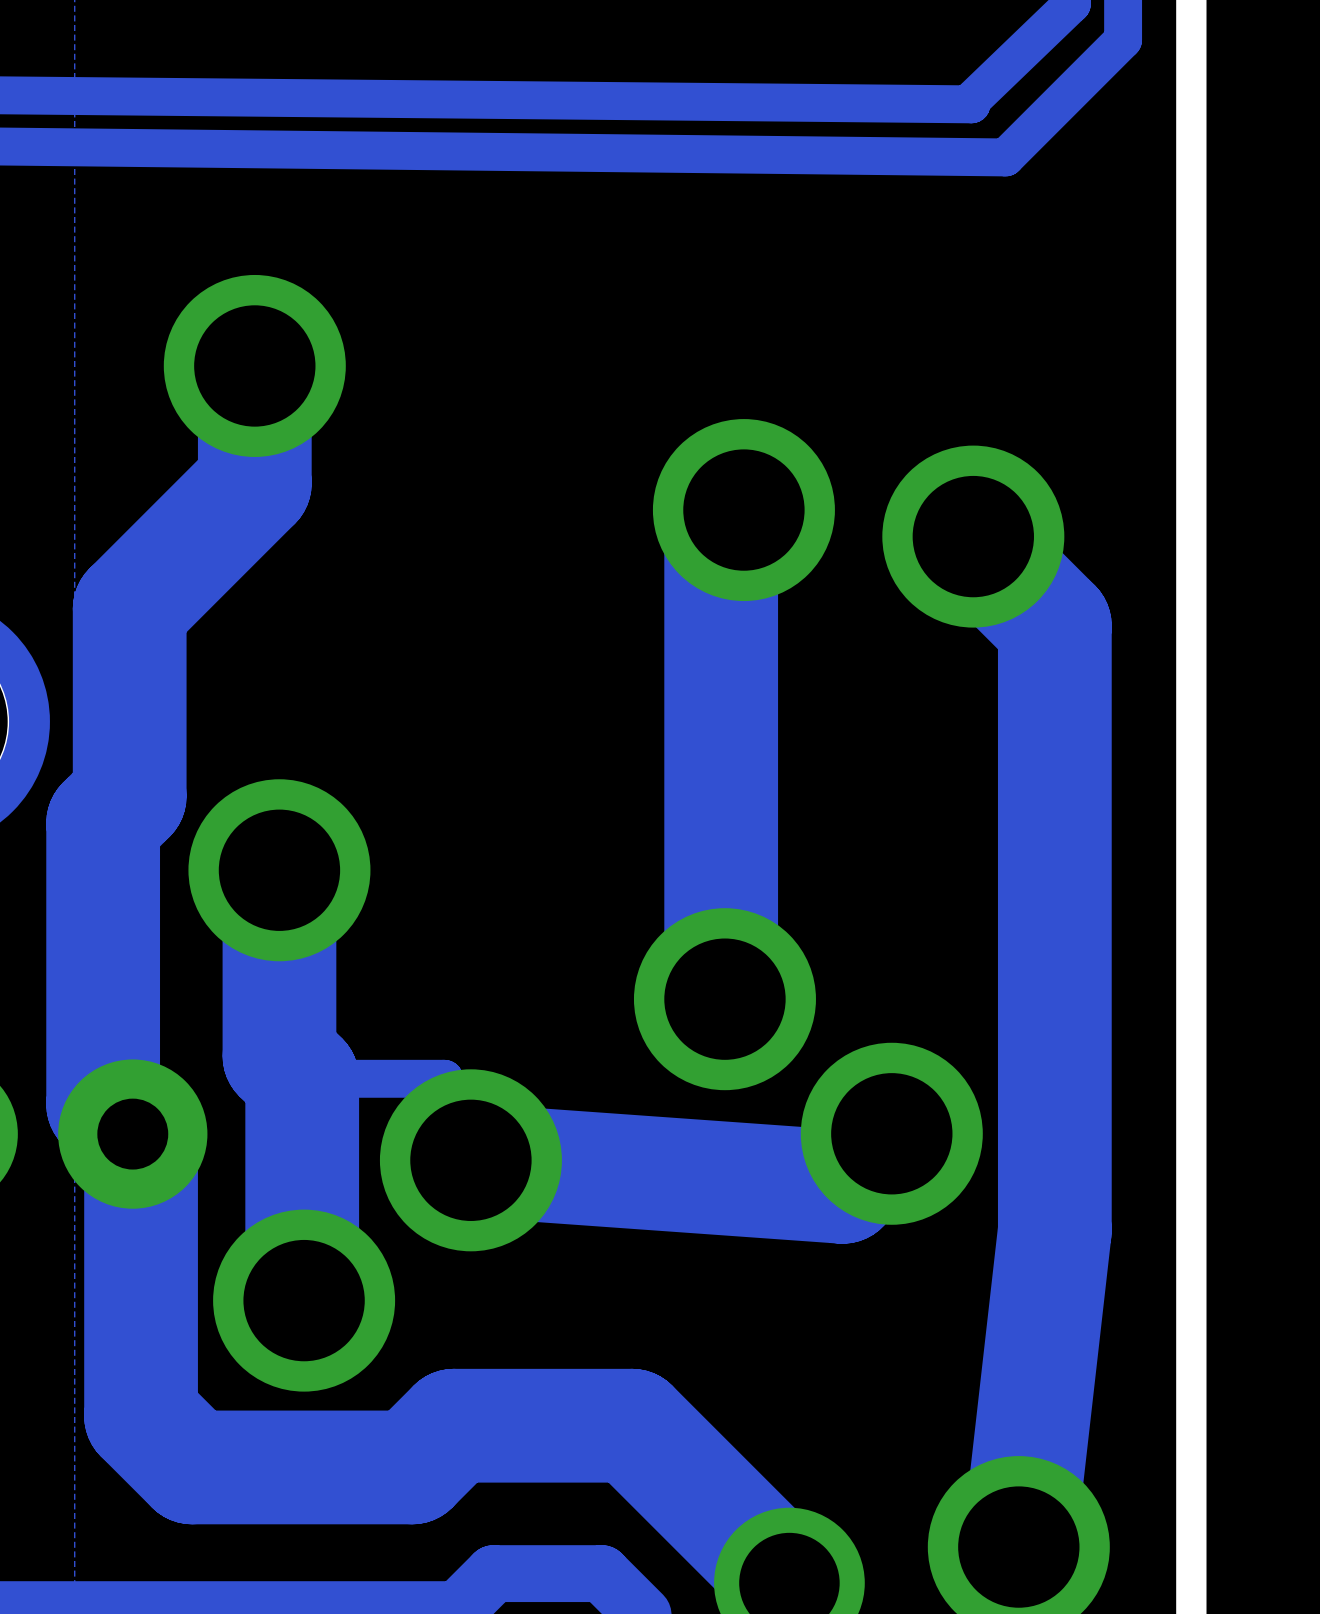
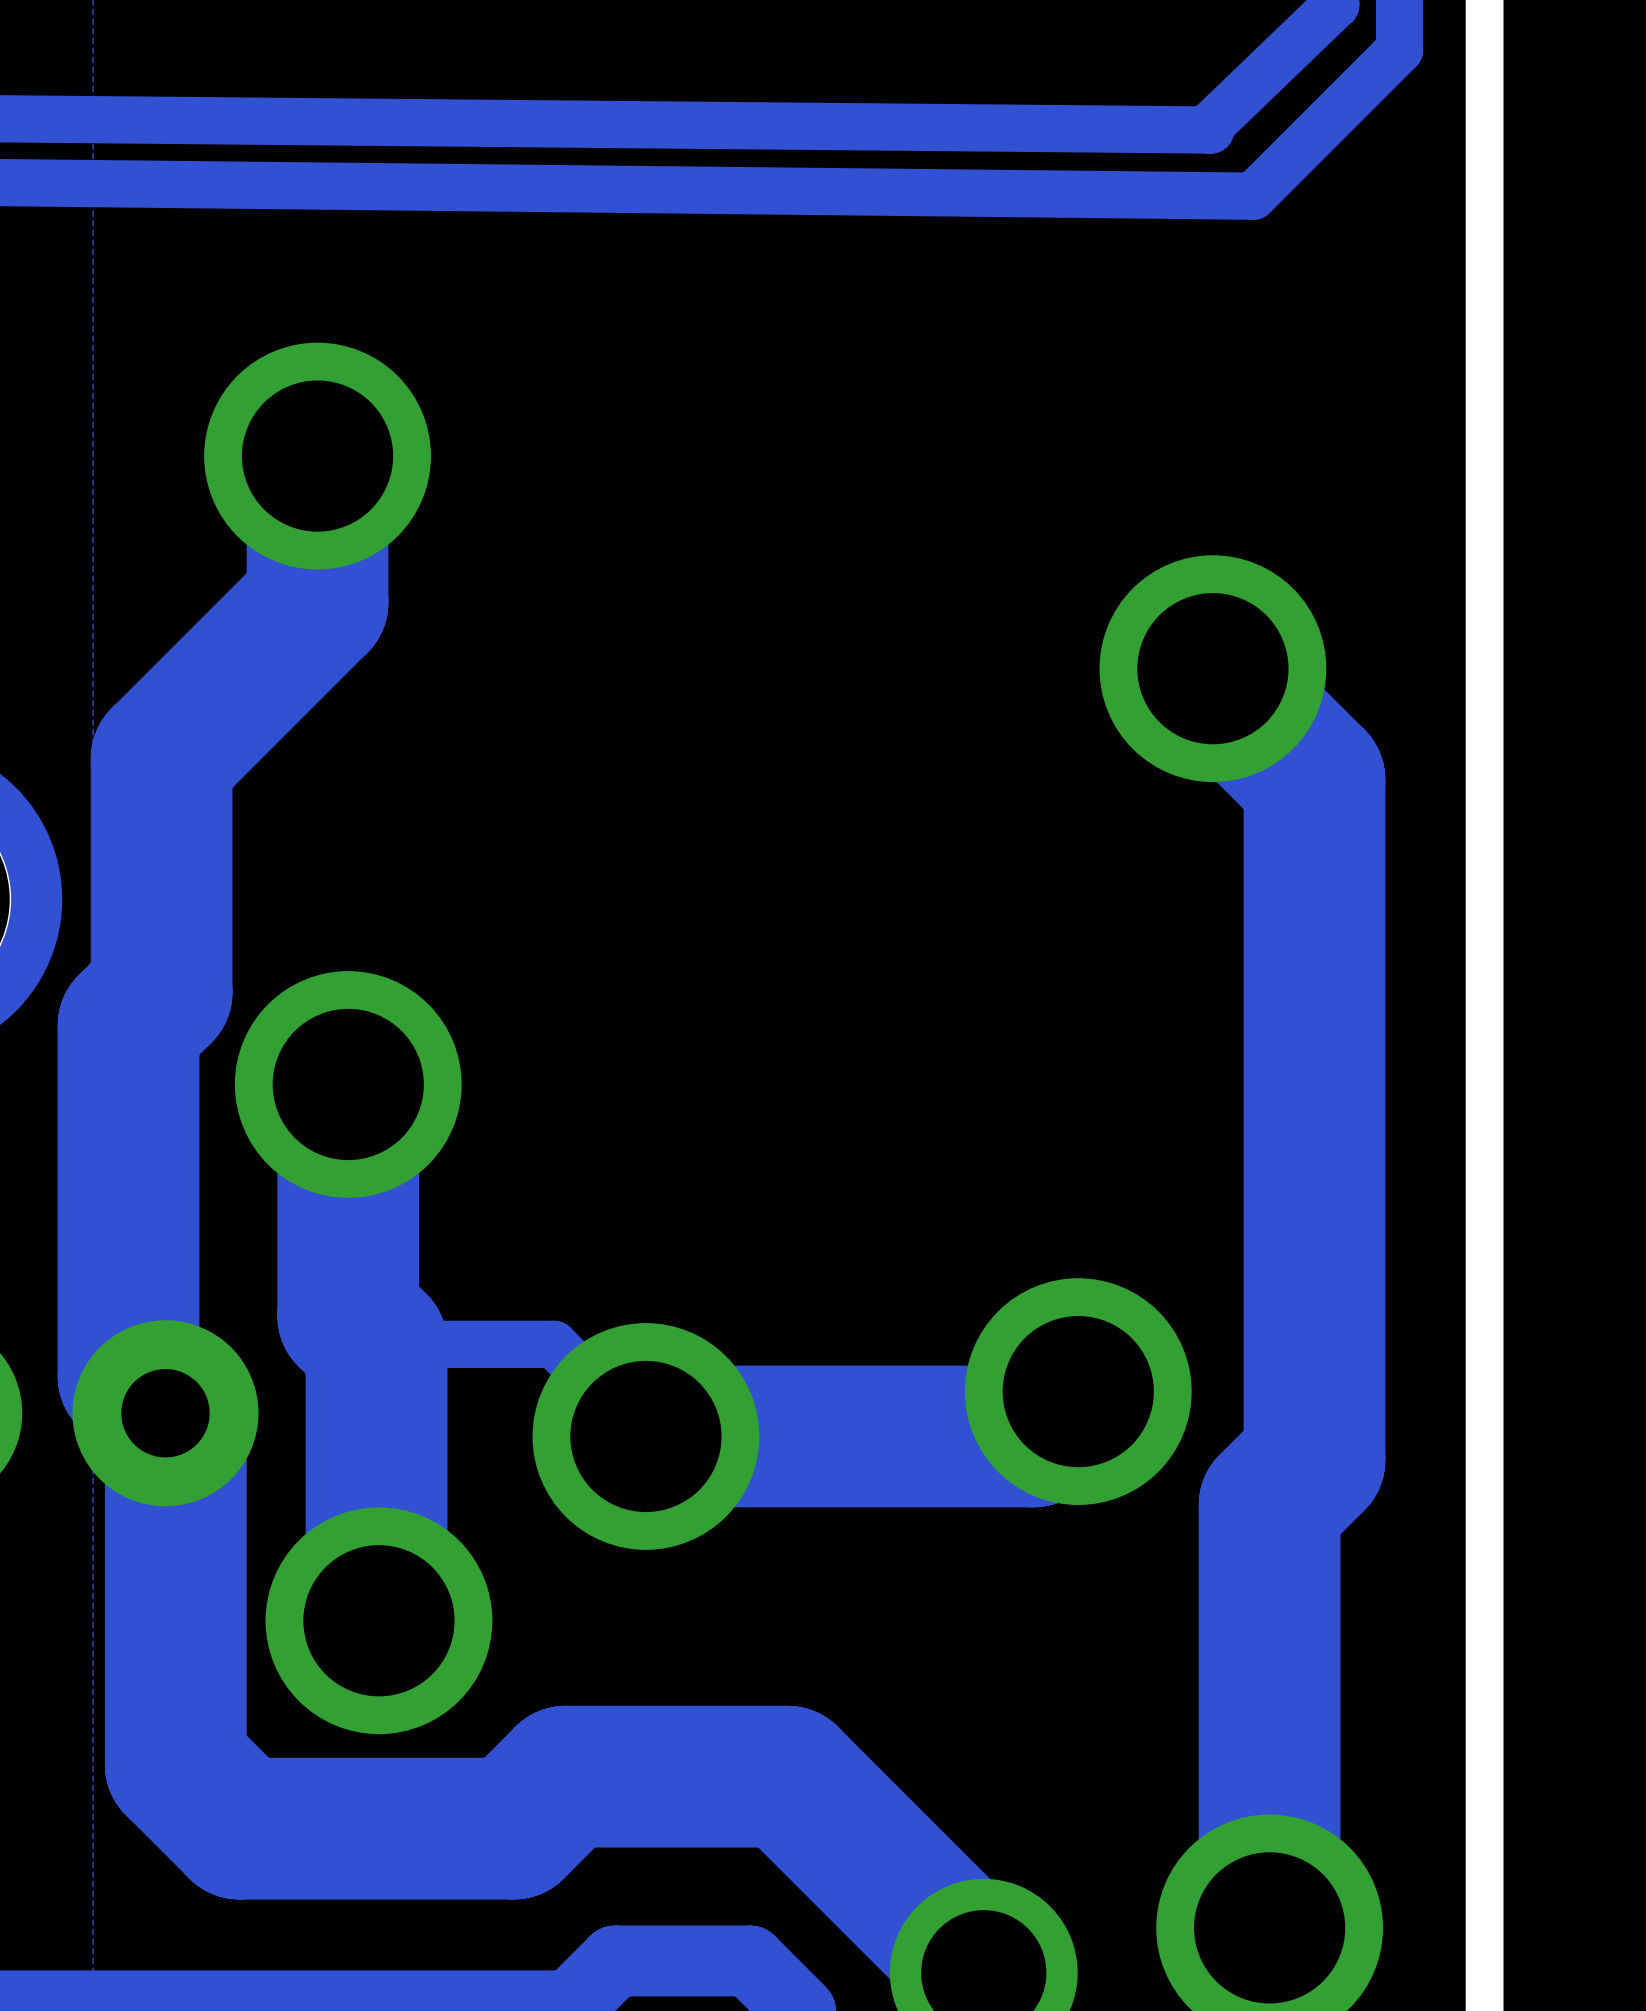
track: (743, 510) (721, 496) (721, 989) (724, 999) -> none
via: (743, 510) -> none
via: (724, 999) -> none
track: (444, 1078) (470, 1160) (842, 1186) (891, 1133) -> (553, 1344) (645, 1436) (1033, 1436) (1078, 1391)
via position: (891, 1133) -> (1078, 1391)
via position: (470, 1160) -> (645, 1436)
track: (1054, 1171) (1054, 1230) (1018, 1547) -> (1314, 1460) (1269, 1504) (1269, 1927)

